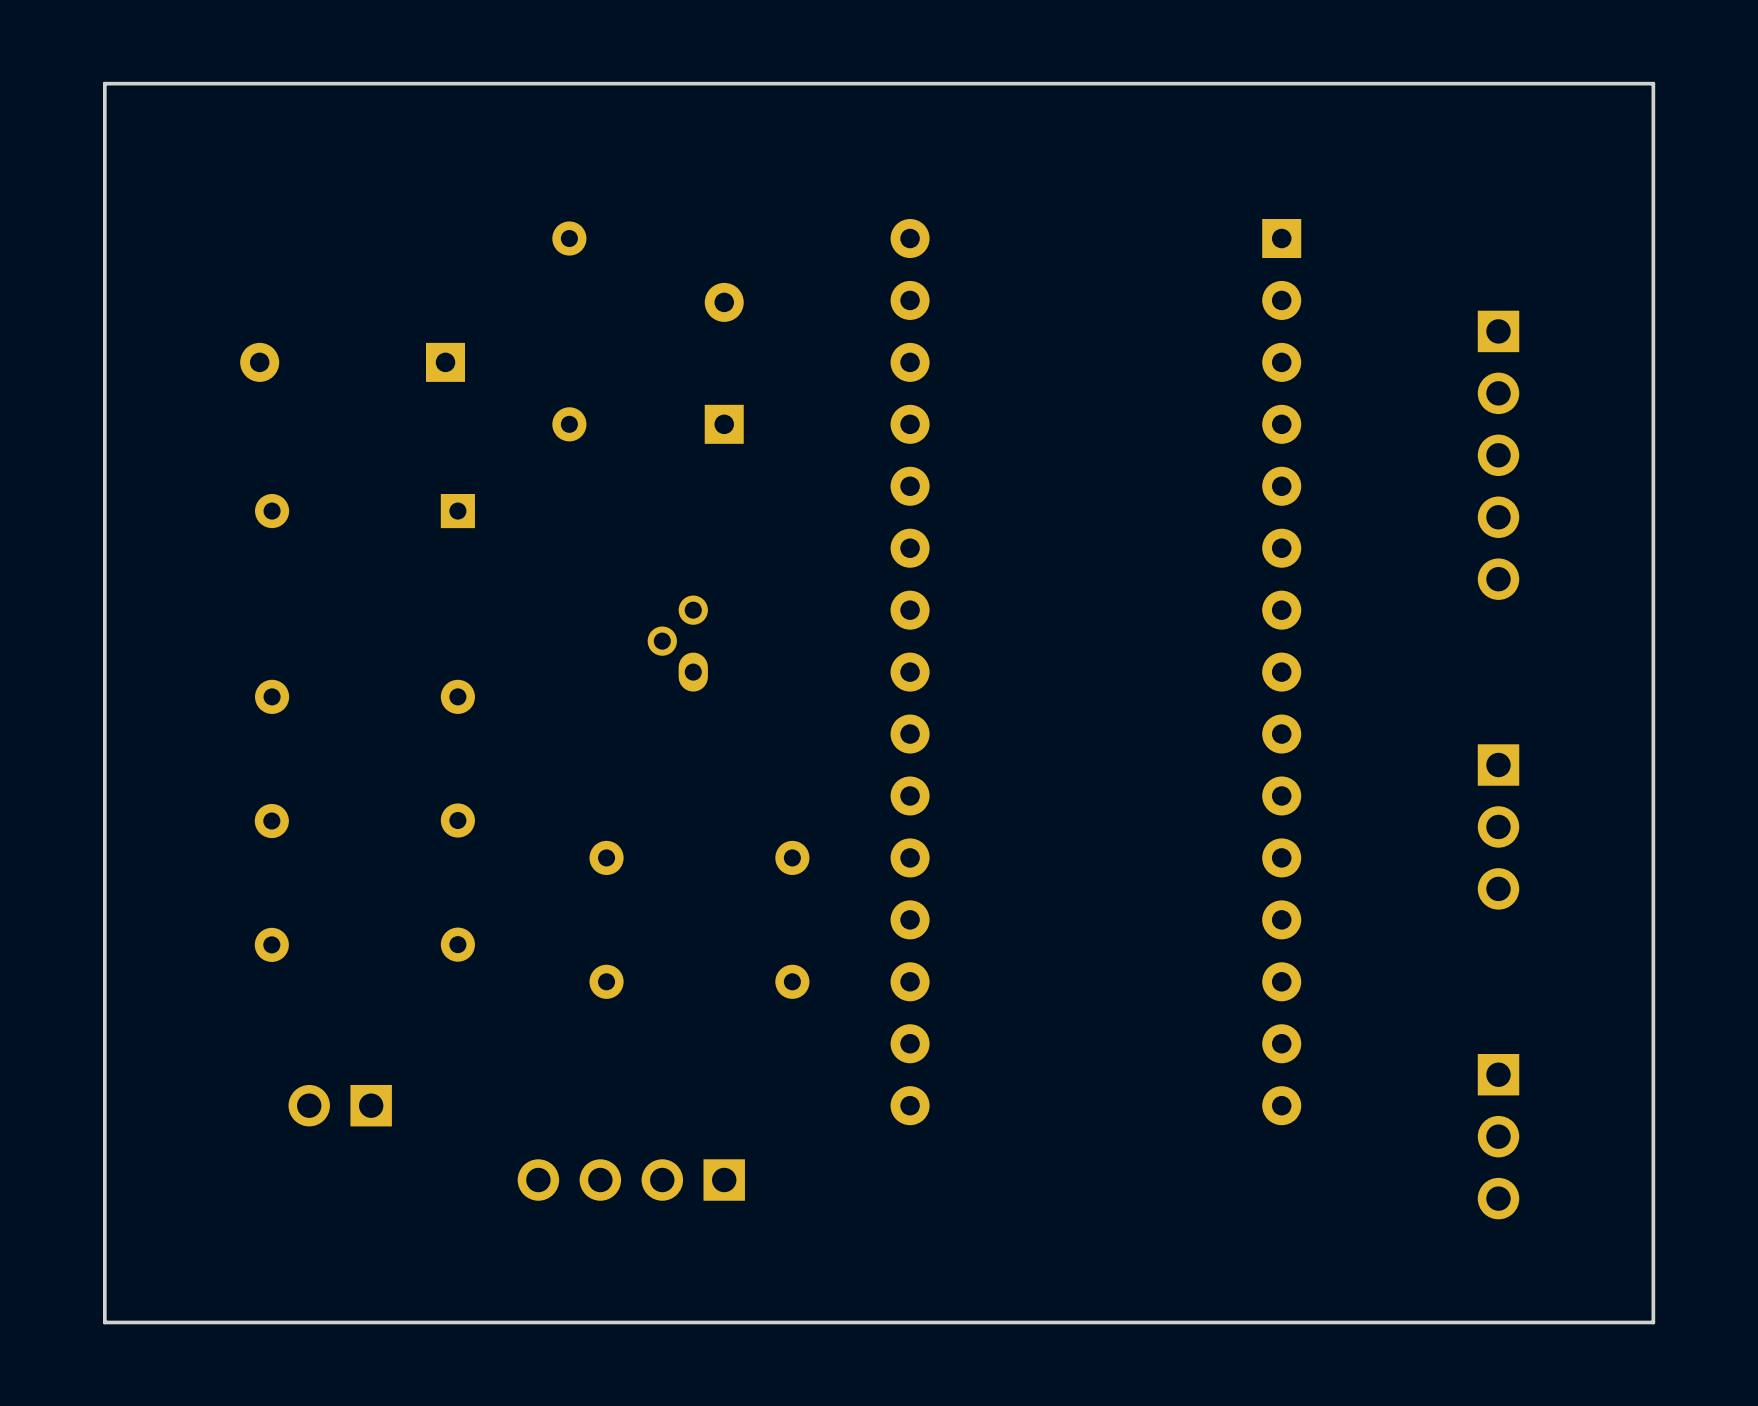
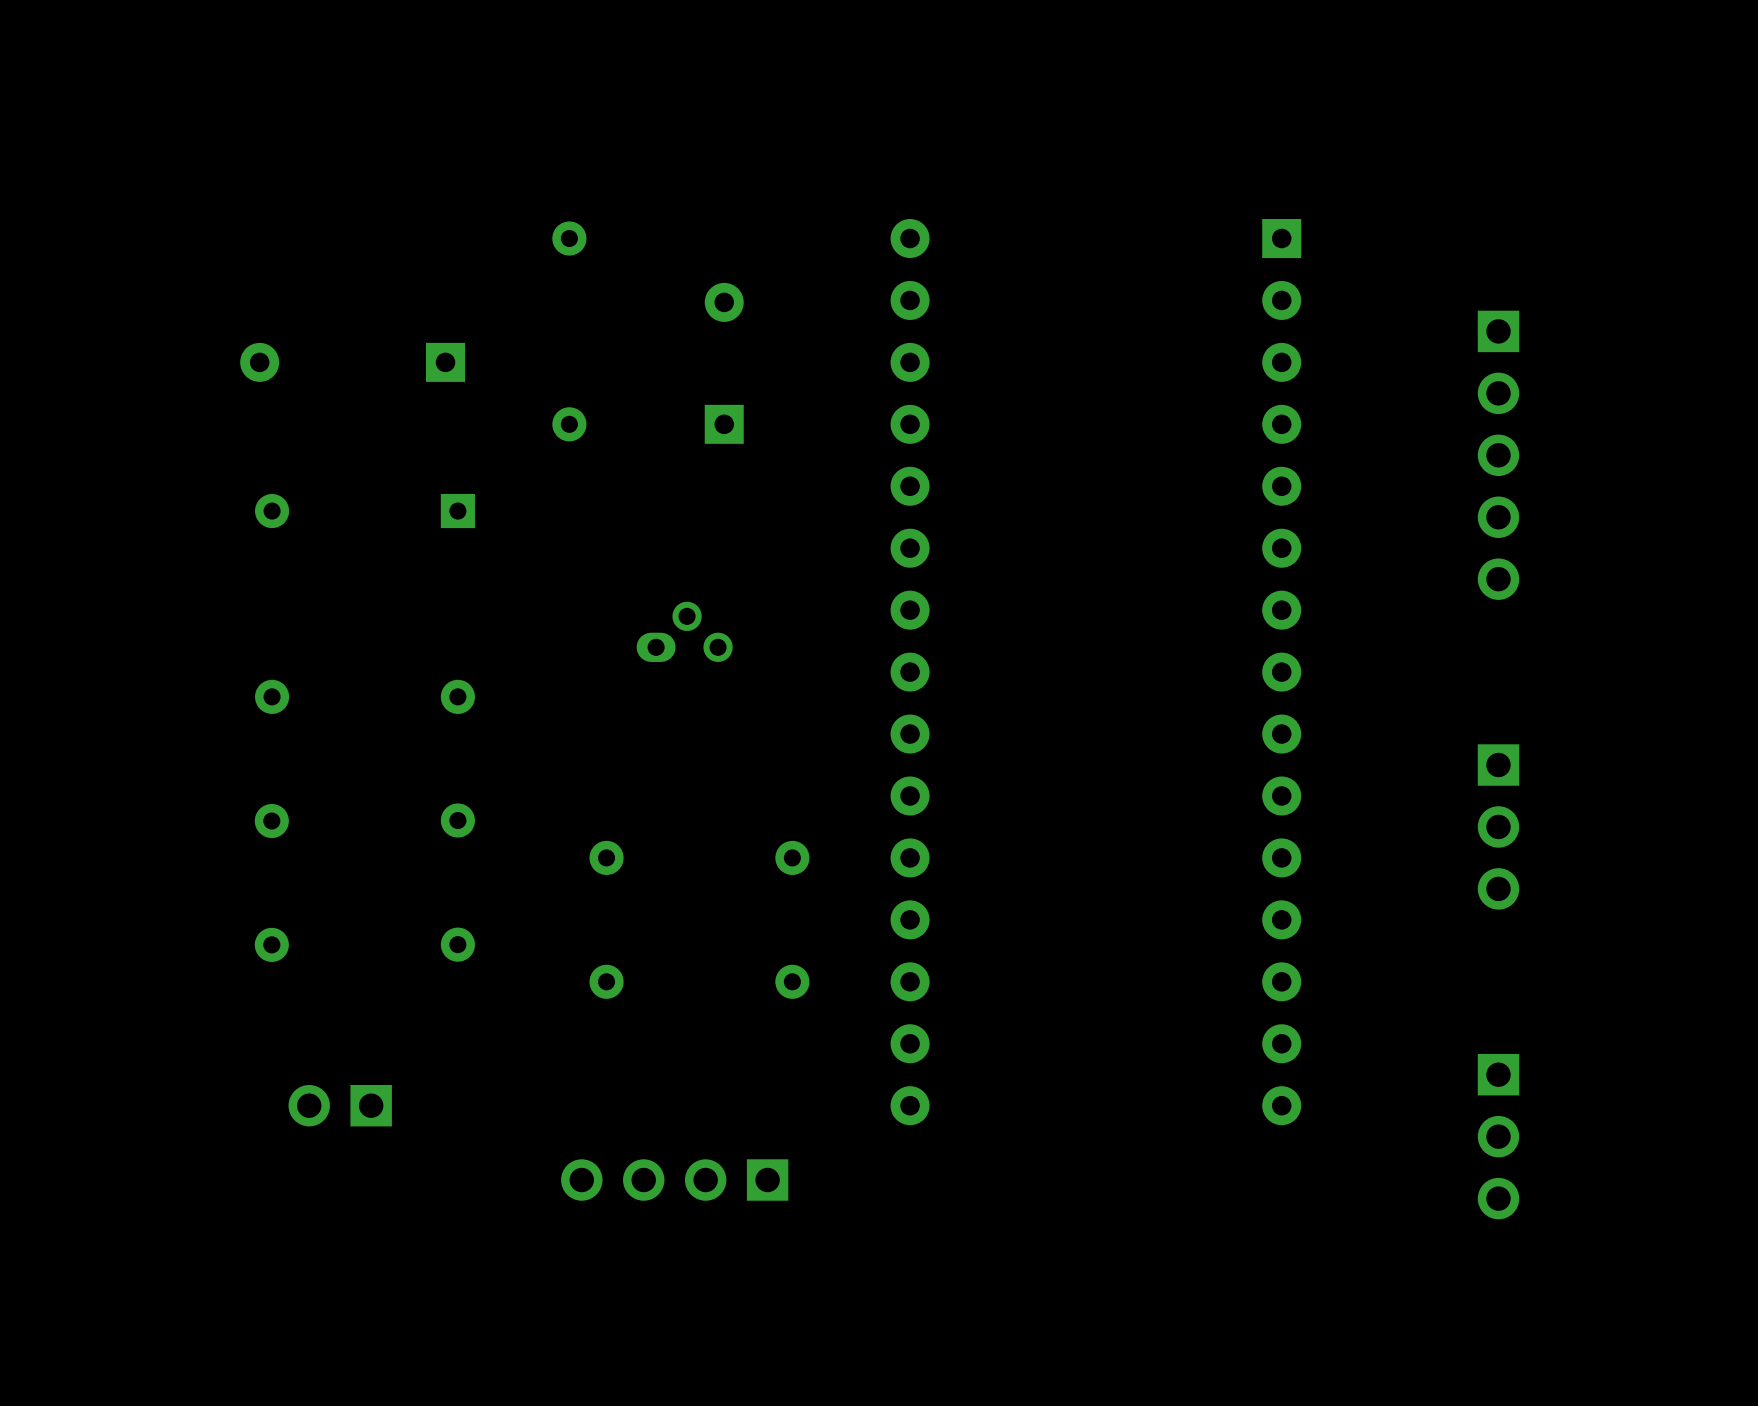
board edge: (1653, 83) (104, 83) (104, 1322) (1653, 1322) (1653, 83) -> none
part rotation: 0° (677, 643) -> 90° clockwise (684, 631)
part position: (631, 1180) -> (674, 1180)

